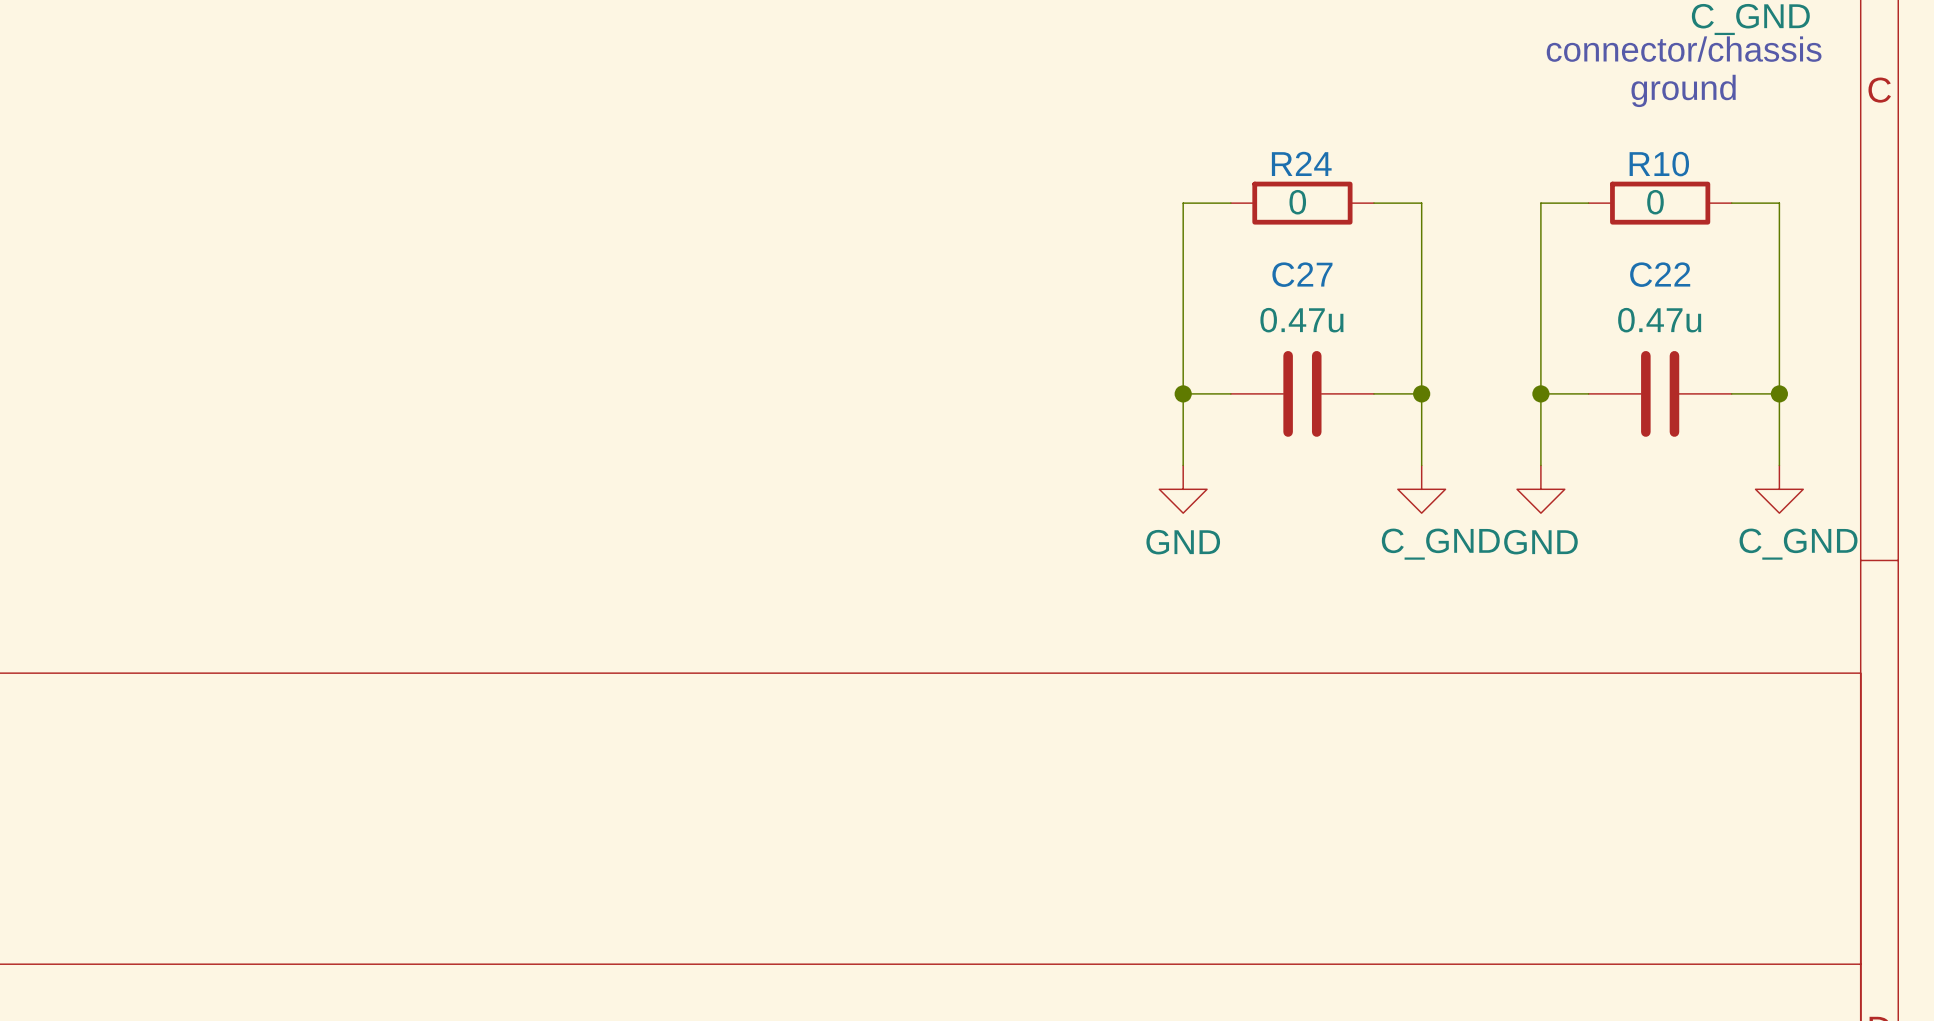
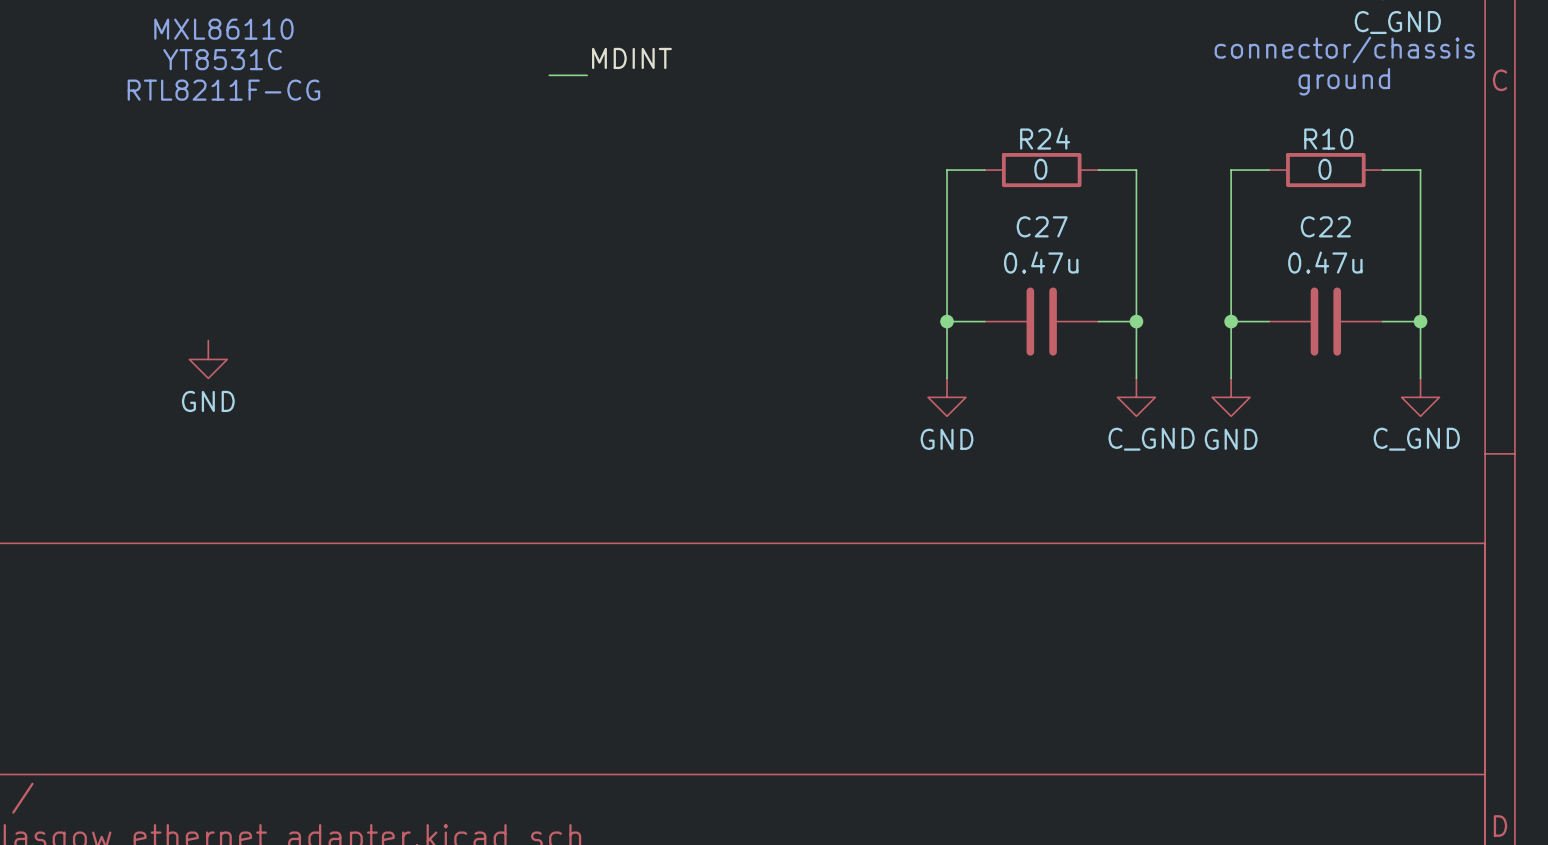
text: none -> MXL86110 (223, 29)
label: none -> MDINT (631, 58)
text: none -> YT8531C (222, 59)
wire: none -> (549, 75) (587, 75)
text: none -> RTL8211F-CG (223, 90)
power symbol: none -> GND (208, 359)
power symbol text position: C_GND (1798, 544) -> C_GND (1416, 439)

